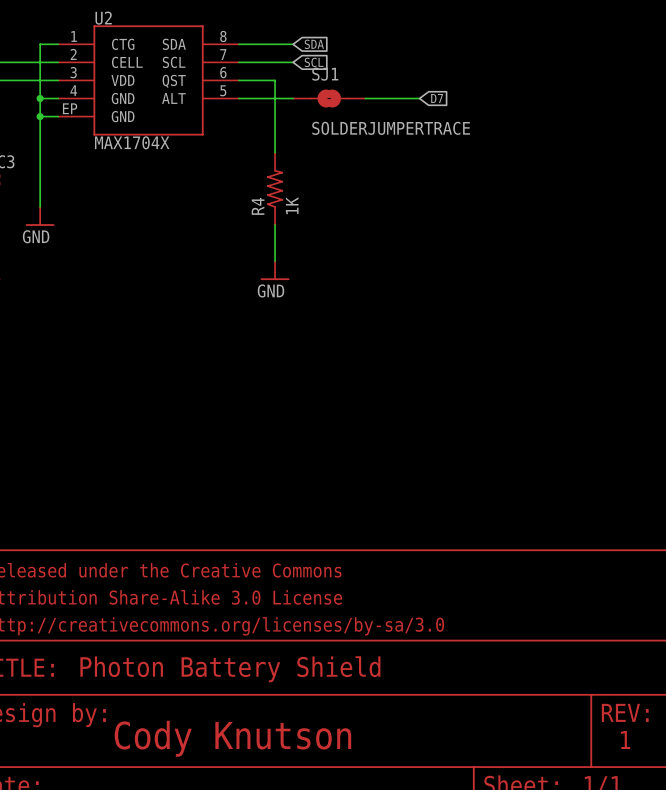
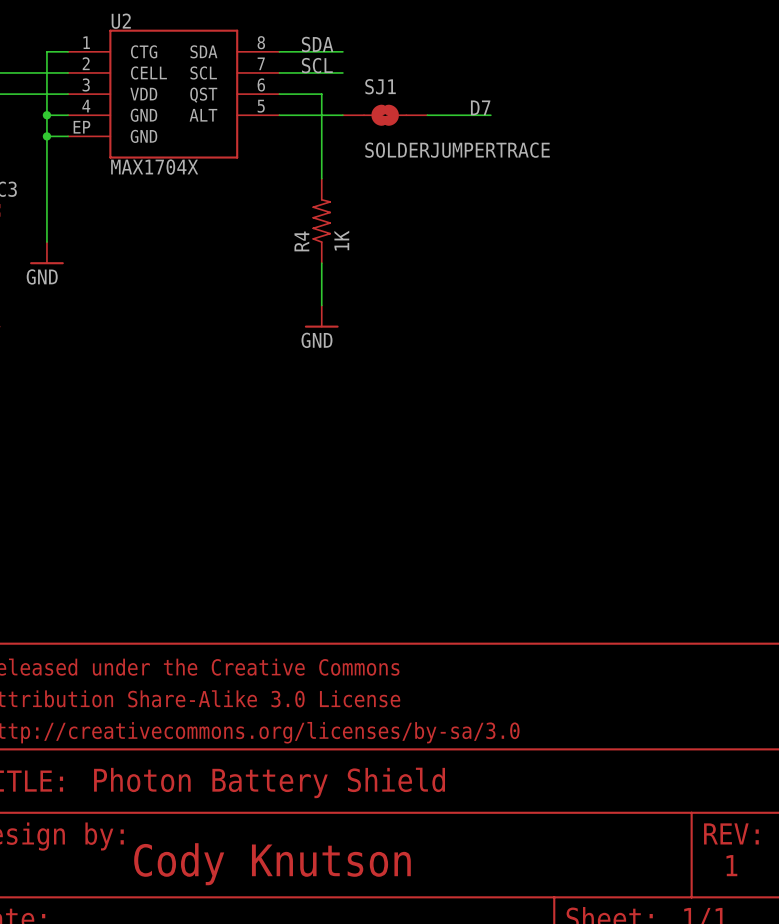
label: none -> SDA (317, 44)
global label: SDA (314, 44) -> none
label: none -> SCL (317, 65)
global label: SCL (314, 62) -> none
label: none -> D7 (480, 107)
global label: D7 (437, 98) -> none

